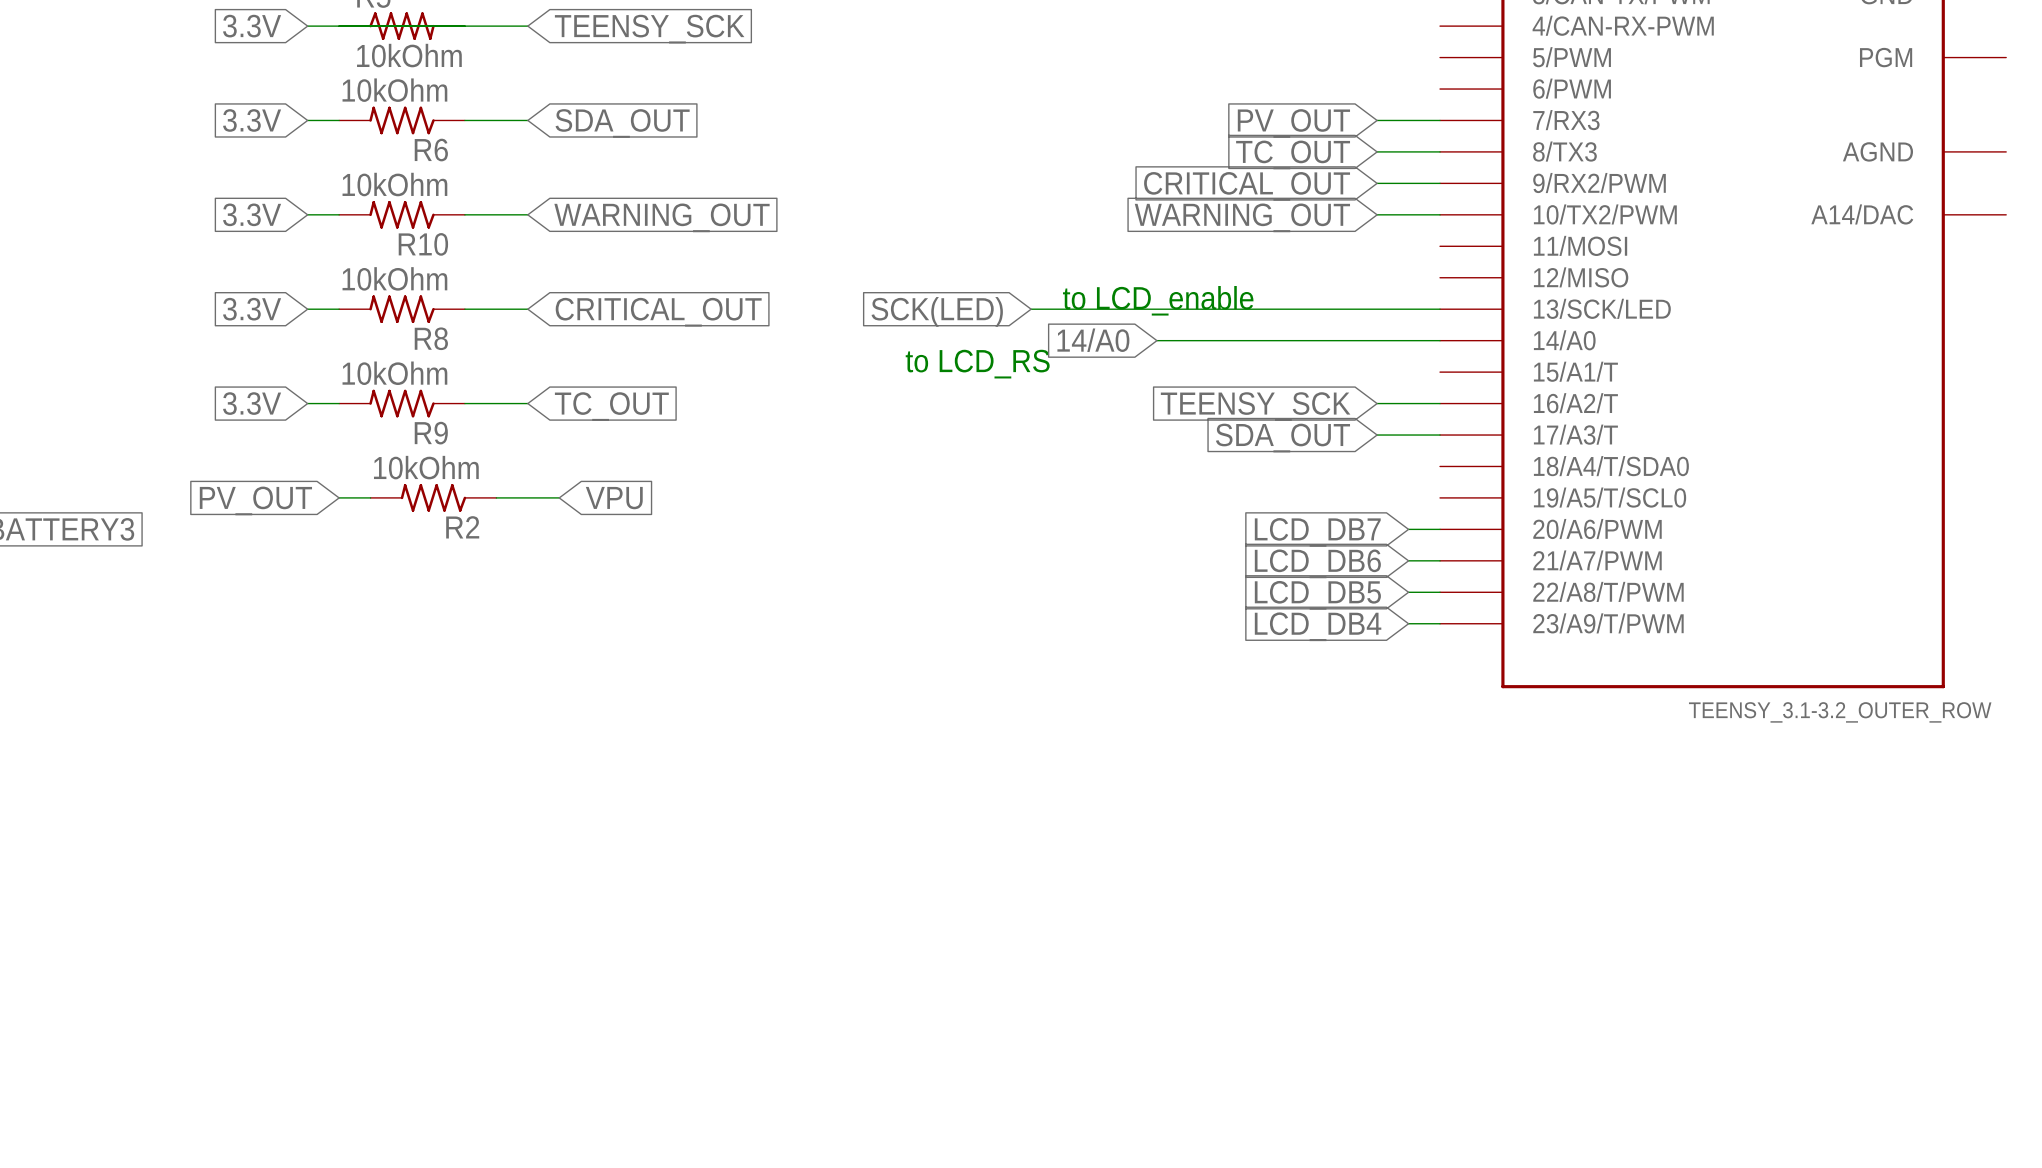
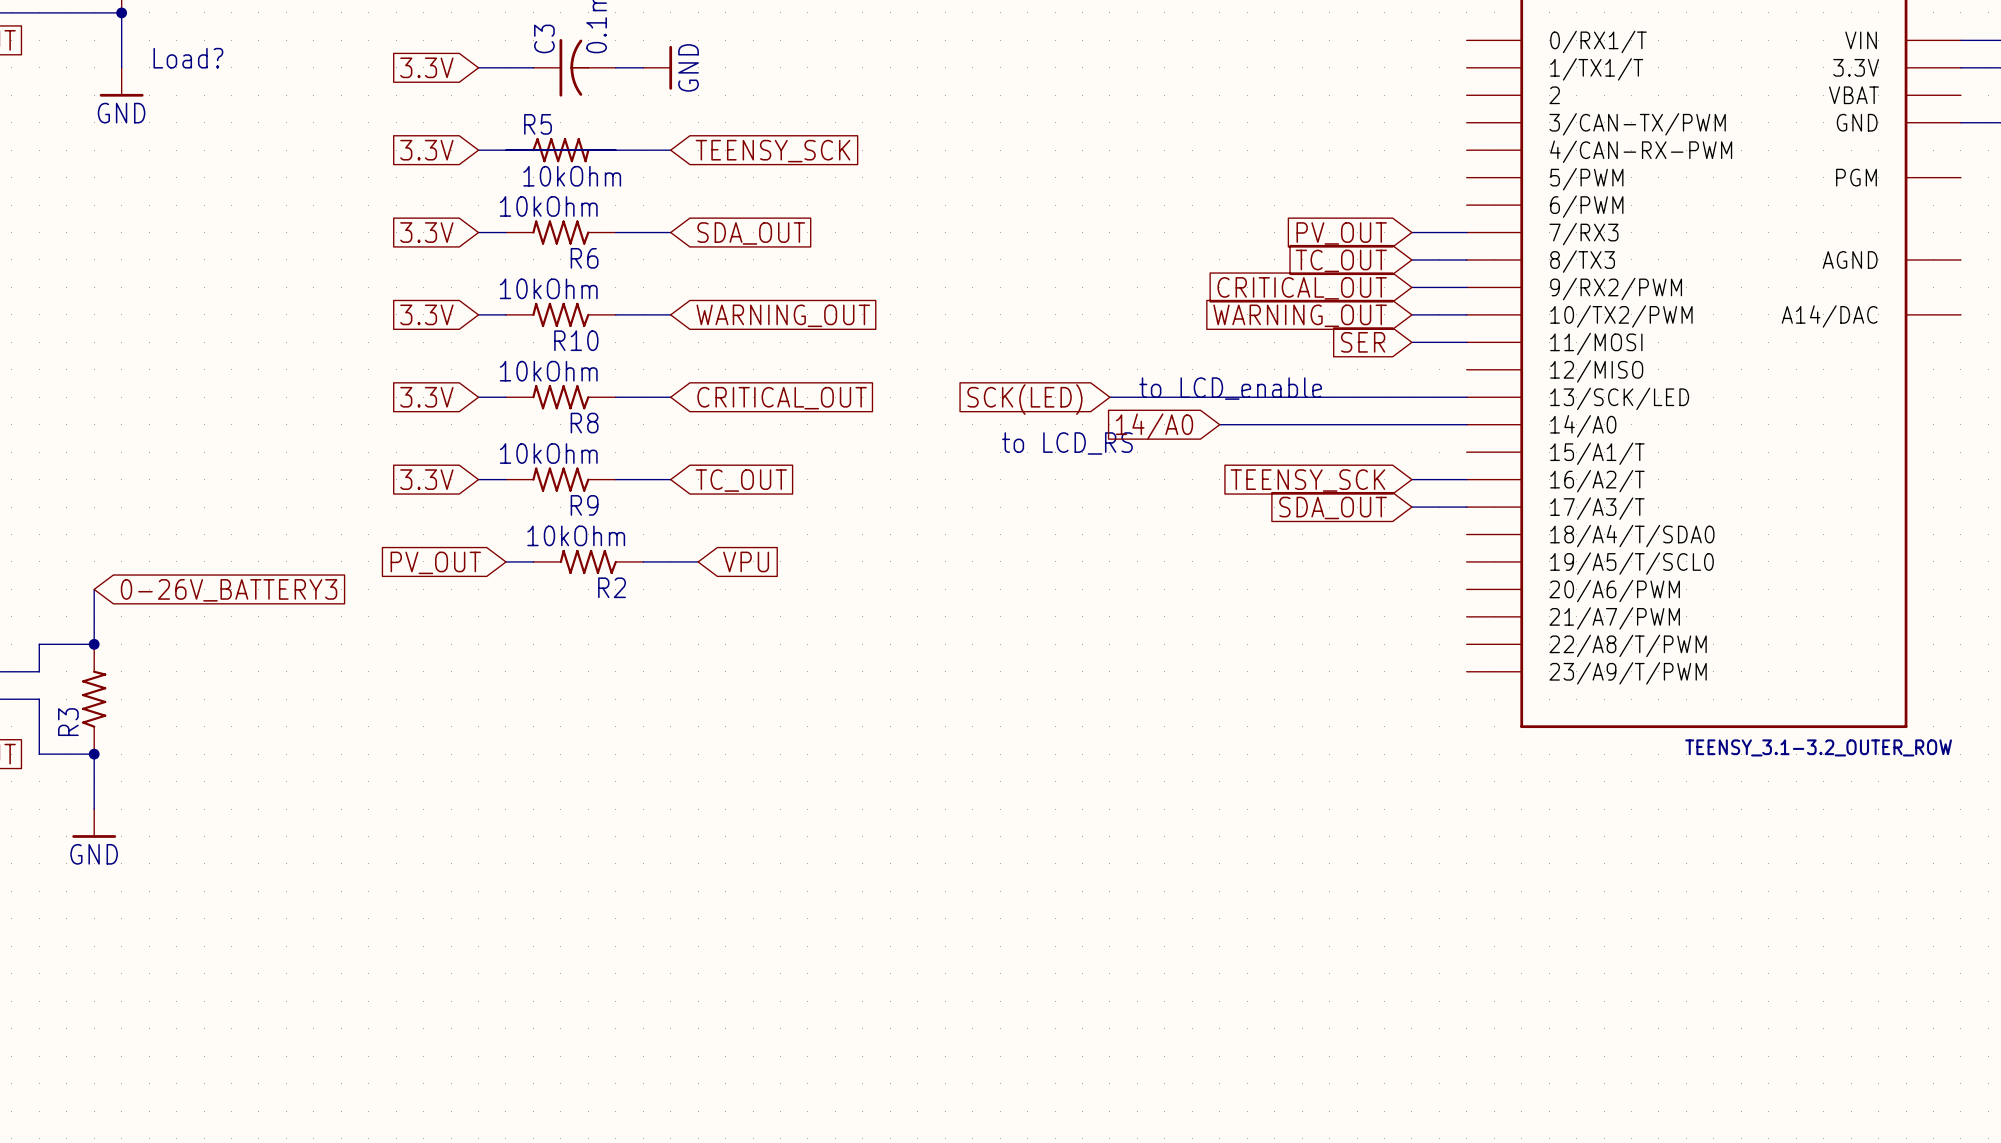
global label: none -> SER (1363, 342)
wire: none -> (1411, 342) (1466, 342)
wire: (1408, 529) (1440, 529) -> none
global label: LCD_DB7 (1317, 532) -> none
wire: (1408, 560) (1440, 560) -> none
global label: LCD_DB6 (1317, 563) -> none
wire: (1408, 592) (1440, 592) -> none
global label: LCD_DB5 (1317, 595) -> none
wire: (1408, 623) (1440, 623) -> none
global label: LCD_DB4 (1318, 626) -> none

